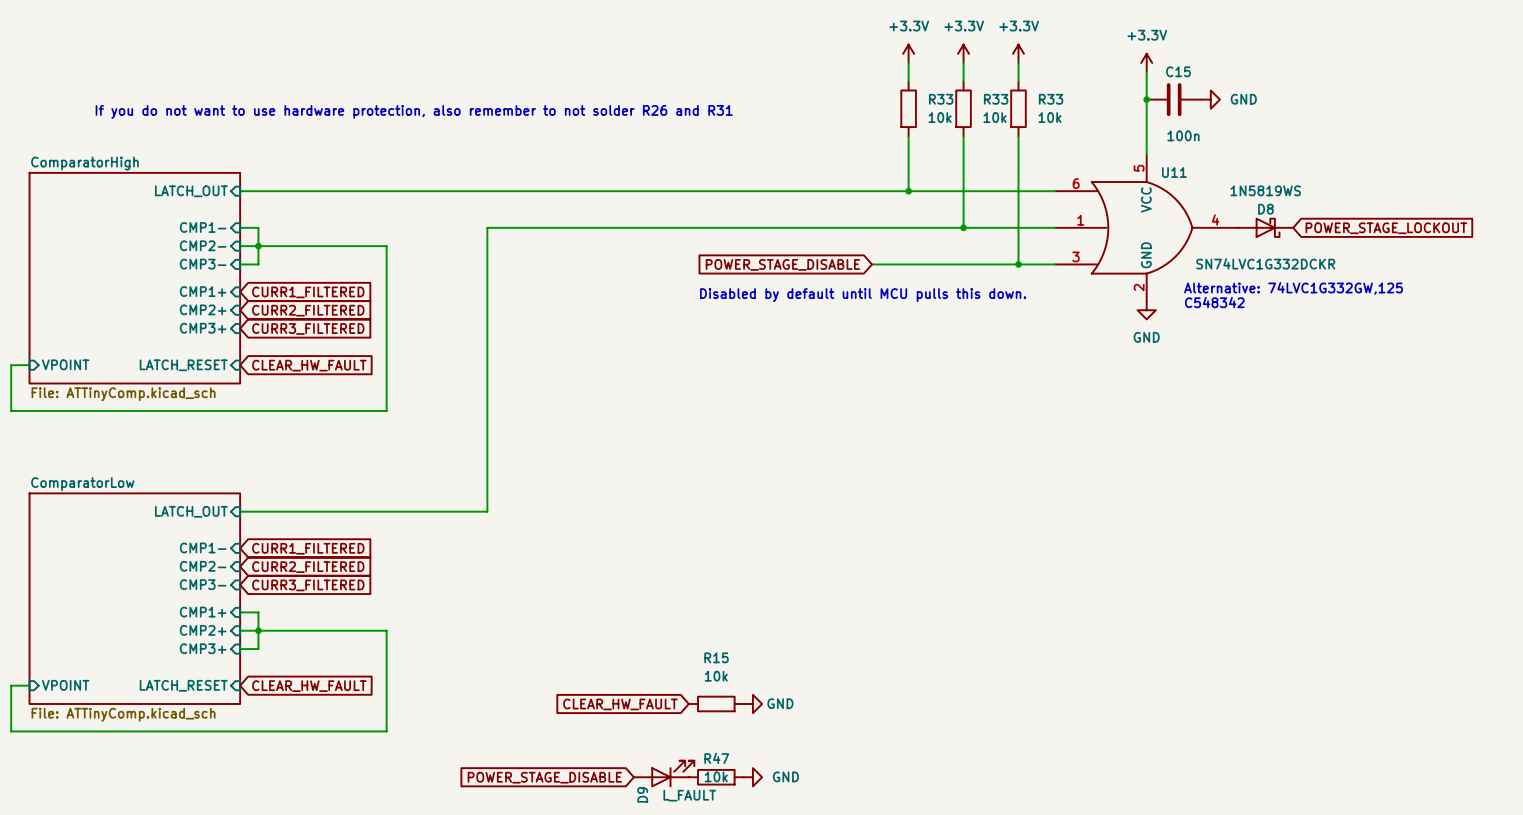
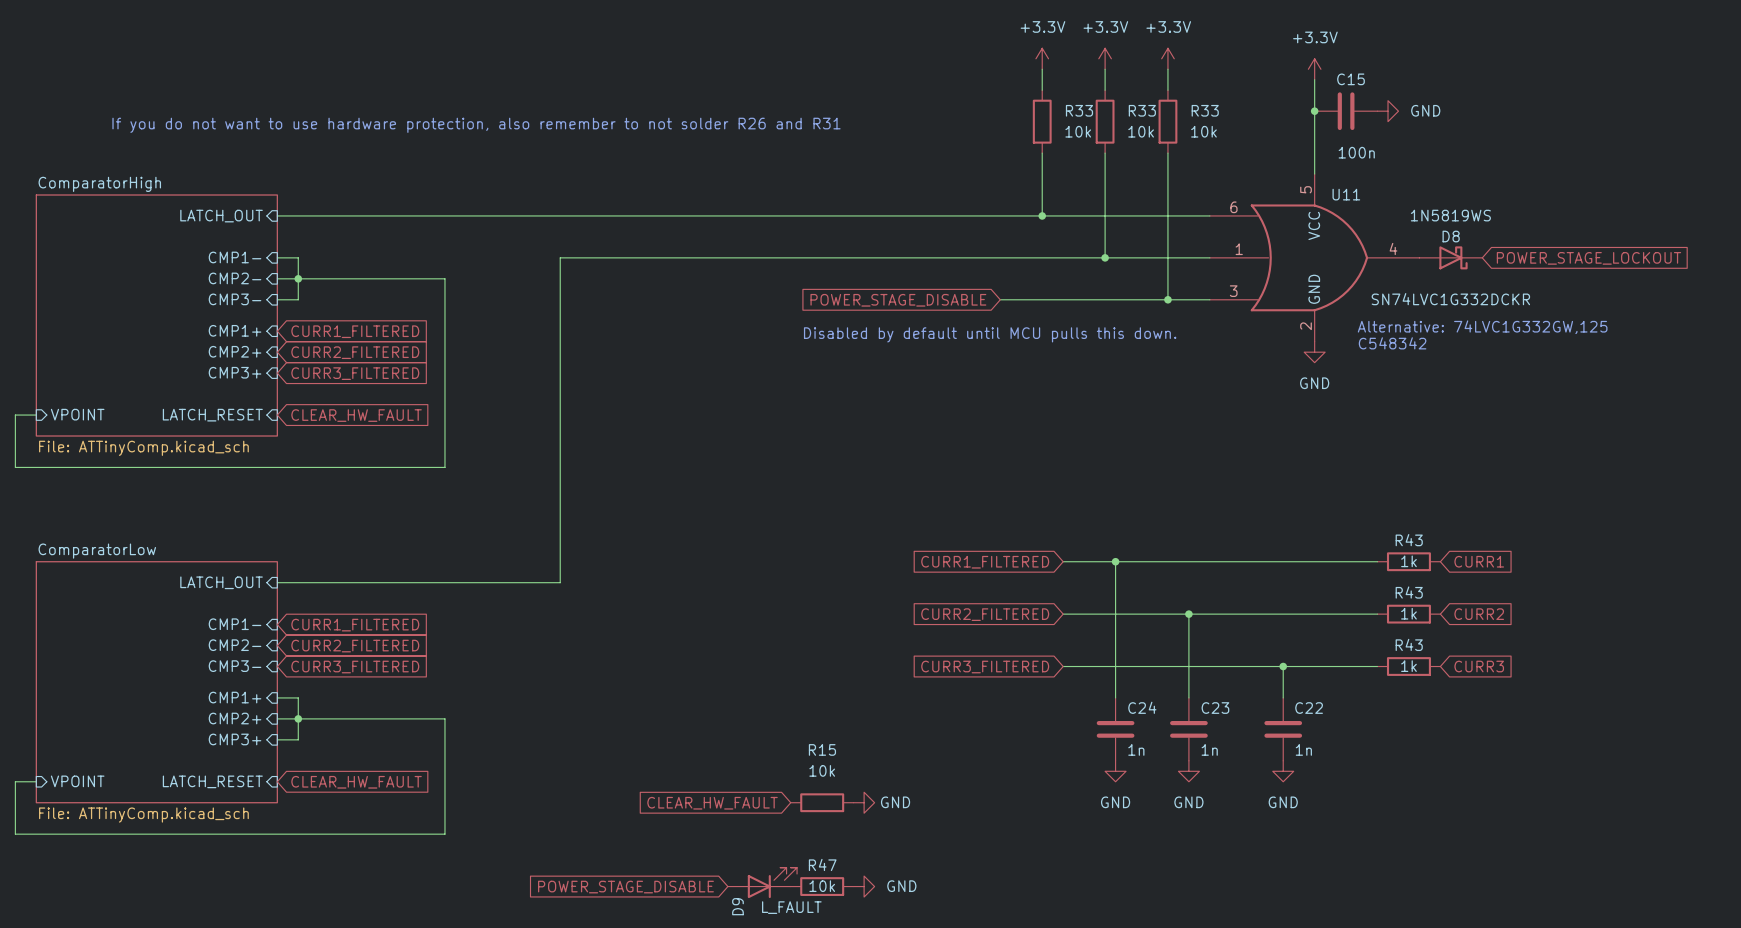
global label: none -> CURR1_FILTERED (985, 562)
wire: none -> (1063, 561) (1377, 561)
wire: none -> (1115, 561) (1115, 697)
junction: none -> (1115, 561)
R43: none -> 1k (1408, 561)
global label: none -> CURR1 (1479, 561)
global label: none -> CURR2_FILTERED (985, 614)
wire: none -> (1063, 614) (1377, 614)
wire: none -> (1188, 614) (1188, 697)
junction: none -> (1188, 614)
R43: none -> 1k (1408, 614)
global label: none -> CURR2 (1479, 614)
wire: none -> (1063, 666) (1377, 666)
wire: none -> (1283, 666) (1283, 697)
junction: none -> (1283, 666)
R43: none -> 1k (1408, 666)
global label: none -> CURR3 (1479, 666)
global label: none -> CURR3_FILTERED (985, 667)
C24: none -> 1n (1115, 729)
C23: none -> 1n (1188, 729)
C22: none -> 1n (1283, 729)
power symbol: none -> GND (1115, 771)
power symbol: none -> GND (1188, 771)
power symbol: none -> GND (1283, 771)

